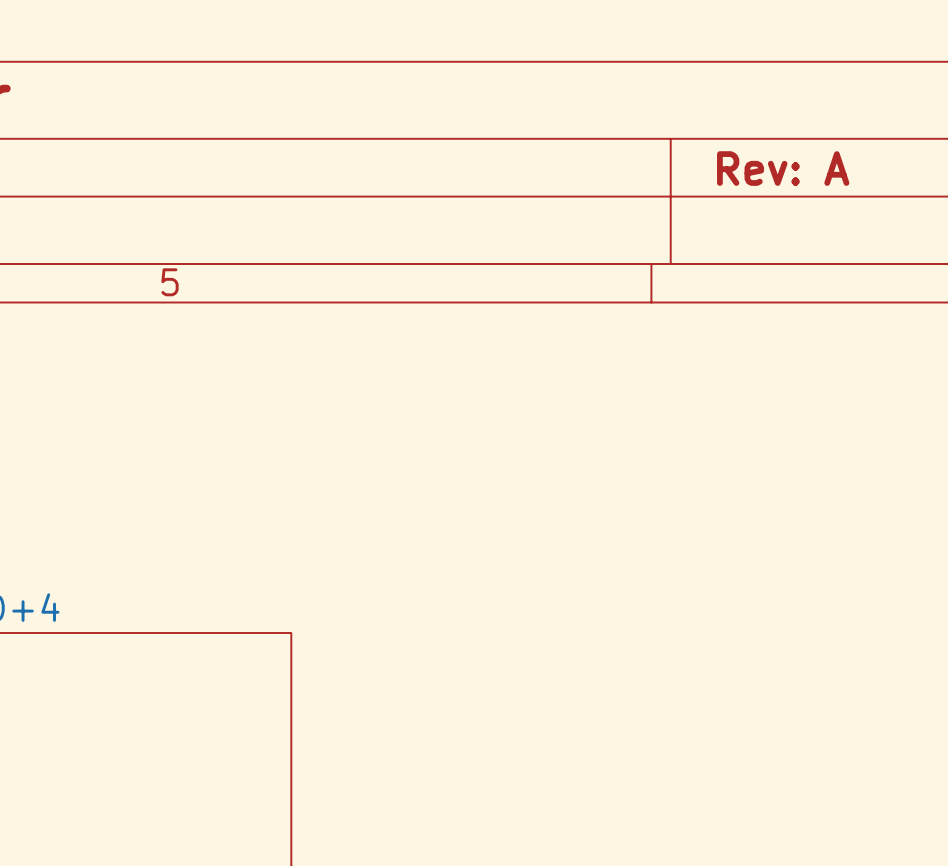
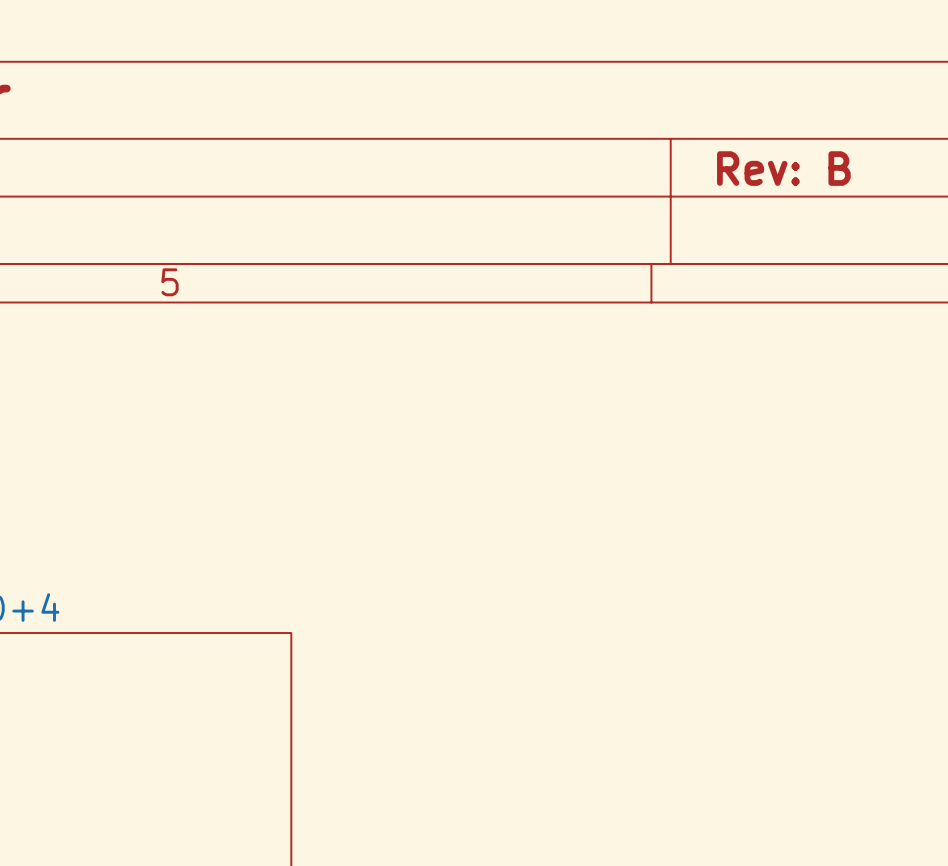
title block: Rev: A (783, 168) -> Rev: B (783, 168)

